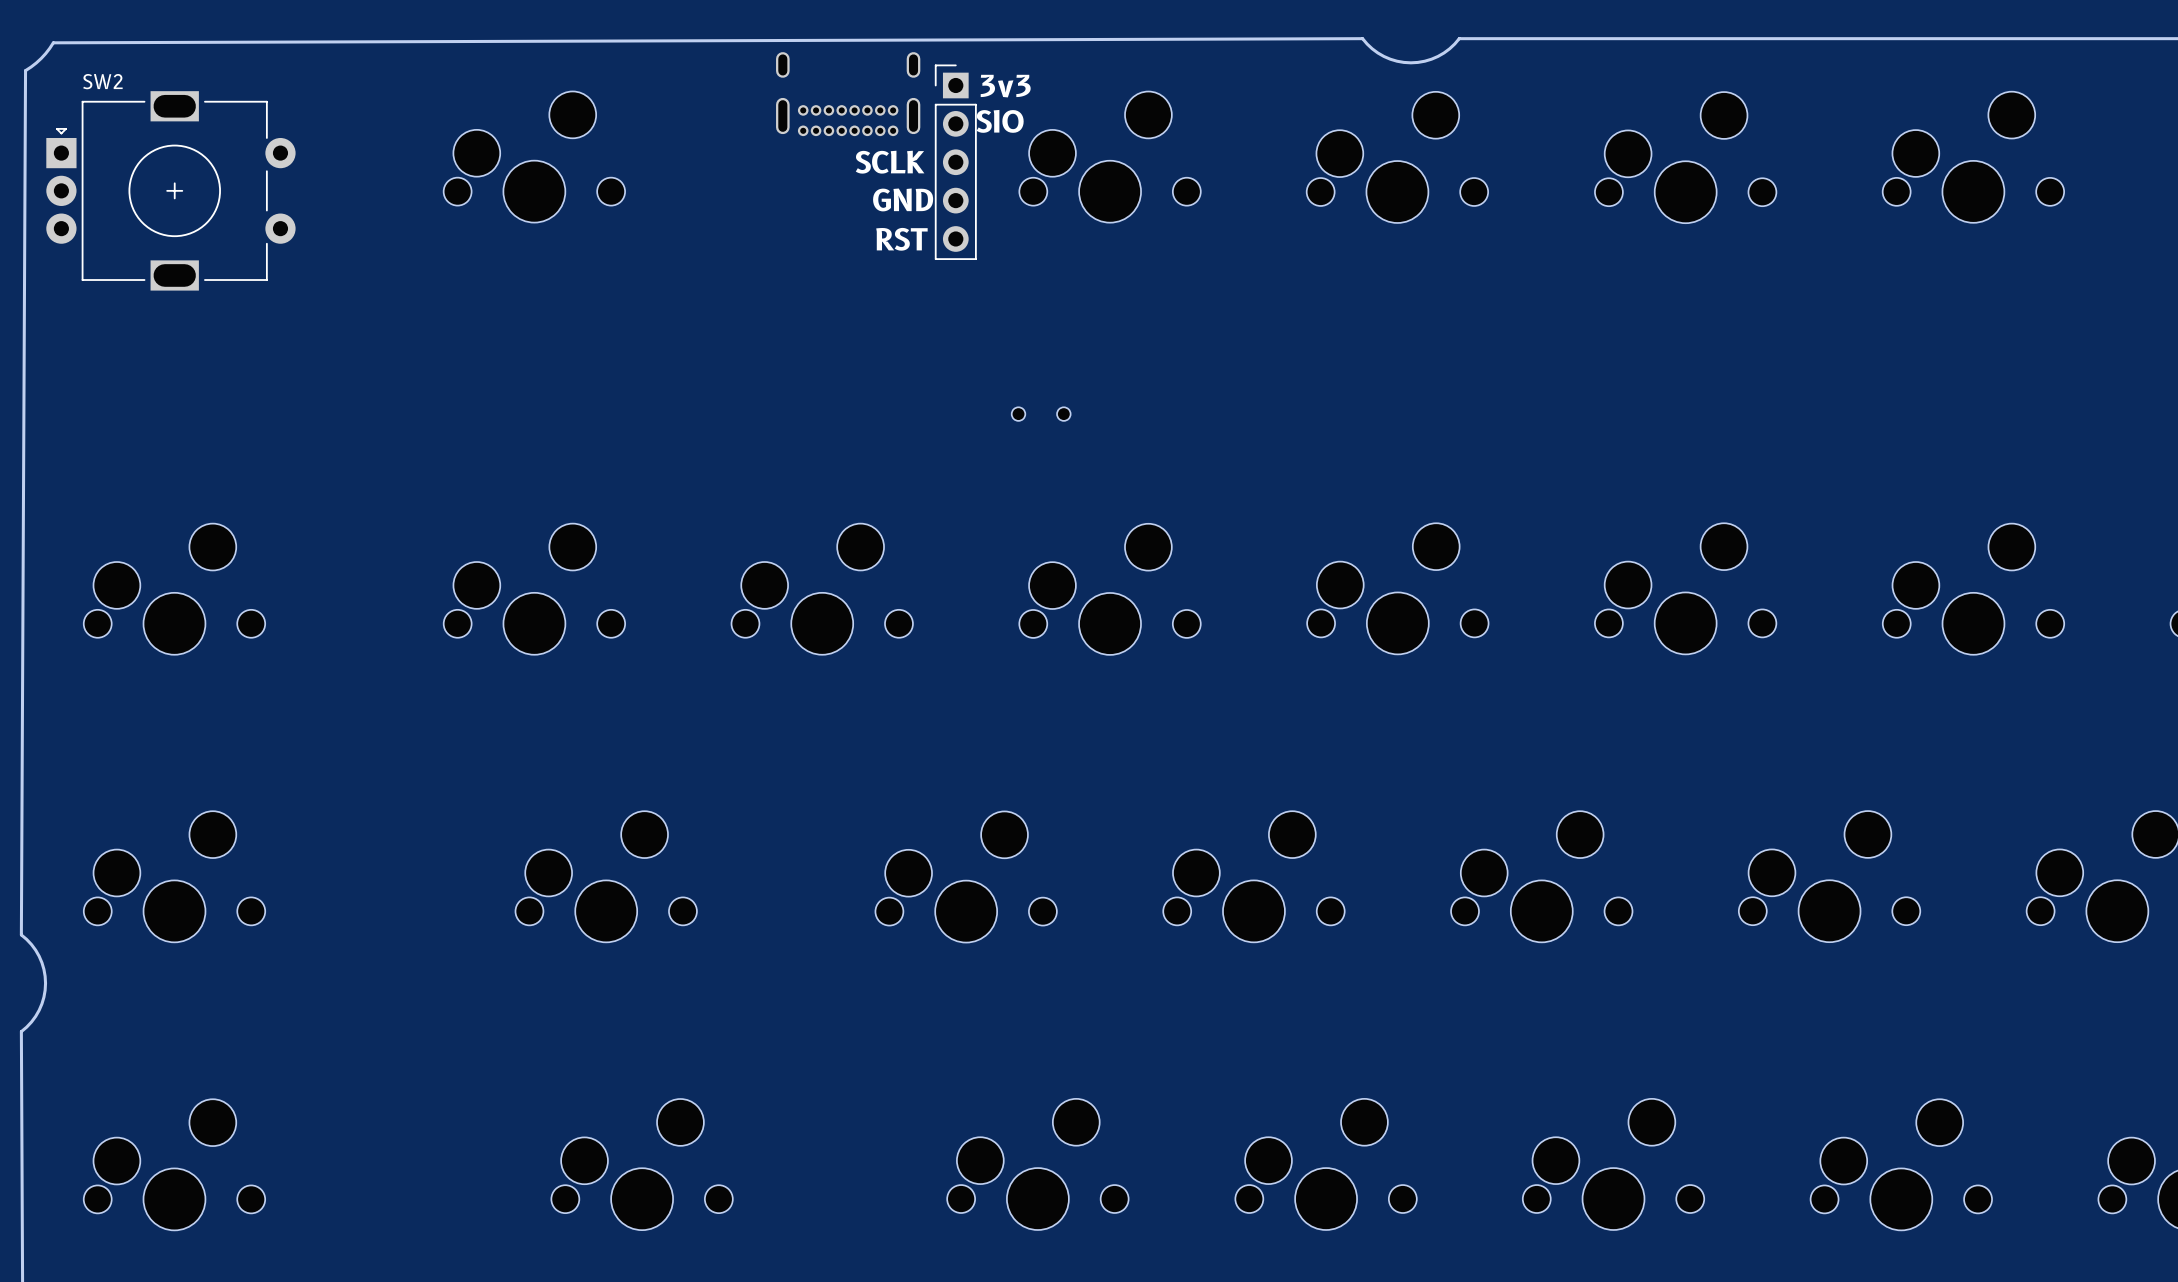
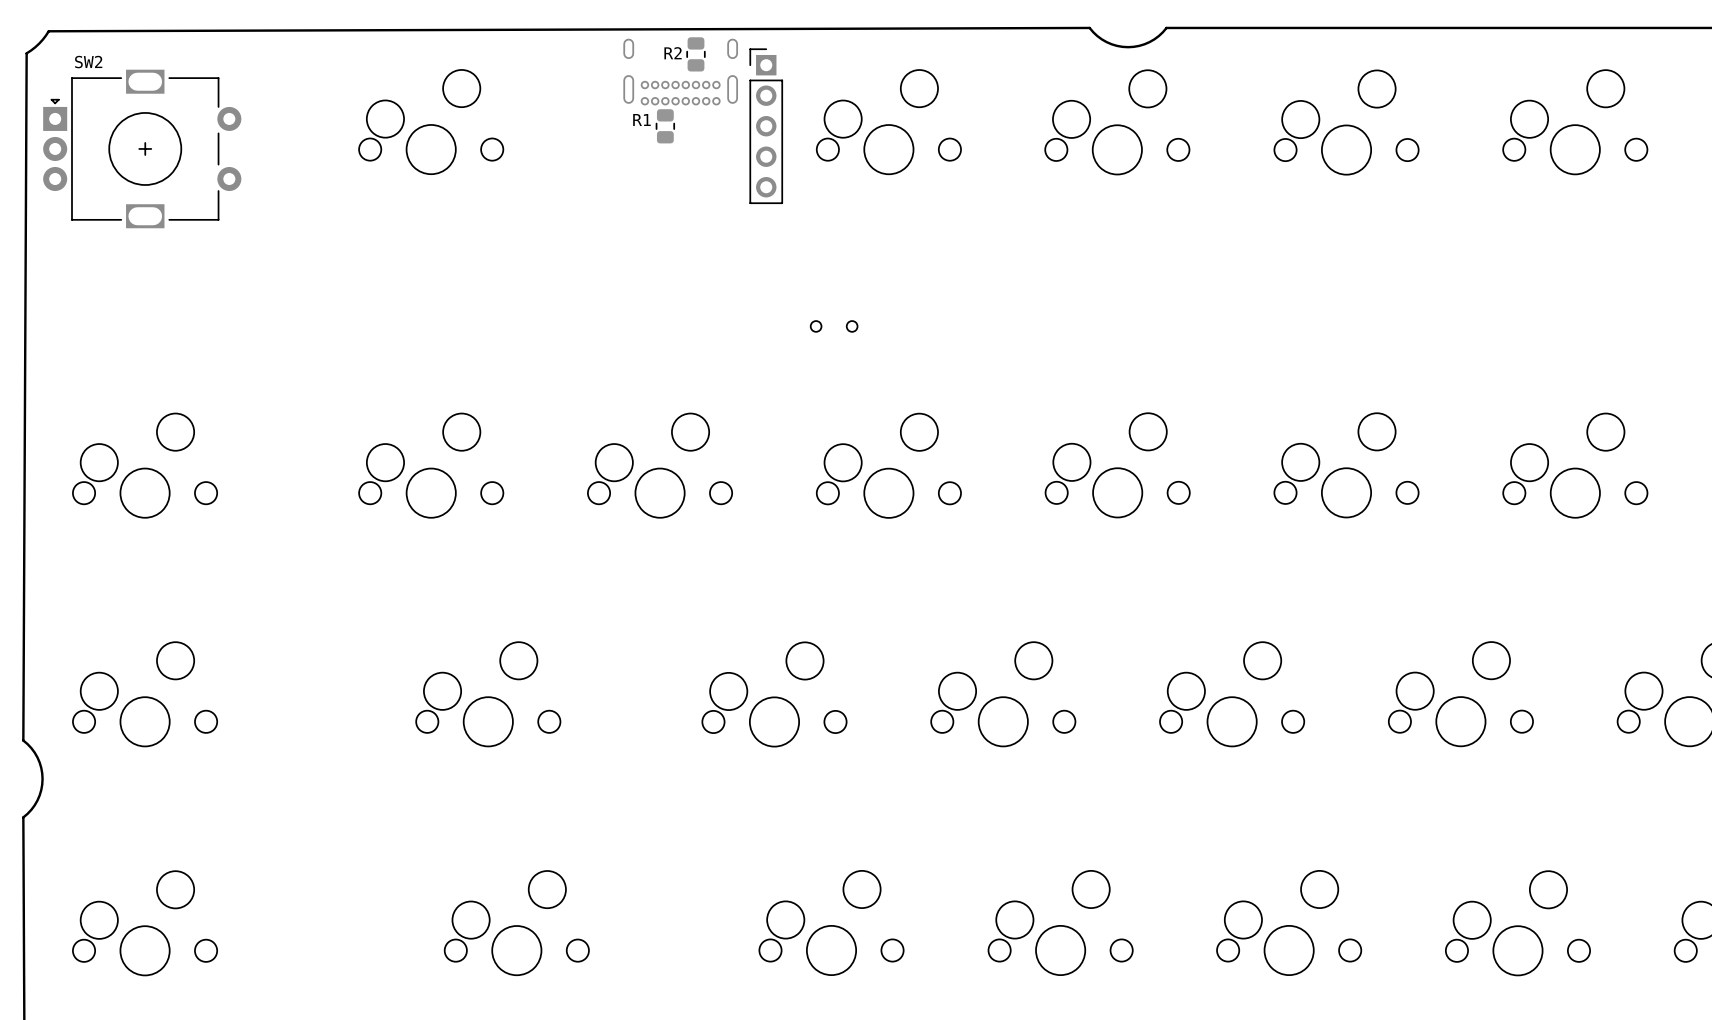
R2: none -> (695, 54)
text: 3v3 (1005, 86) -> none
text: SIO (1000, 121) -> none
R1: none -> (665, 126)
text: SCLK (890, 162) -> none
text: GND (903, 199) -> none
text: RST (901, 239) -> none

